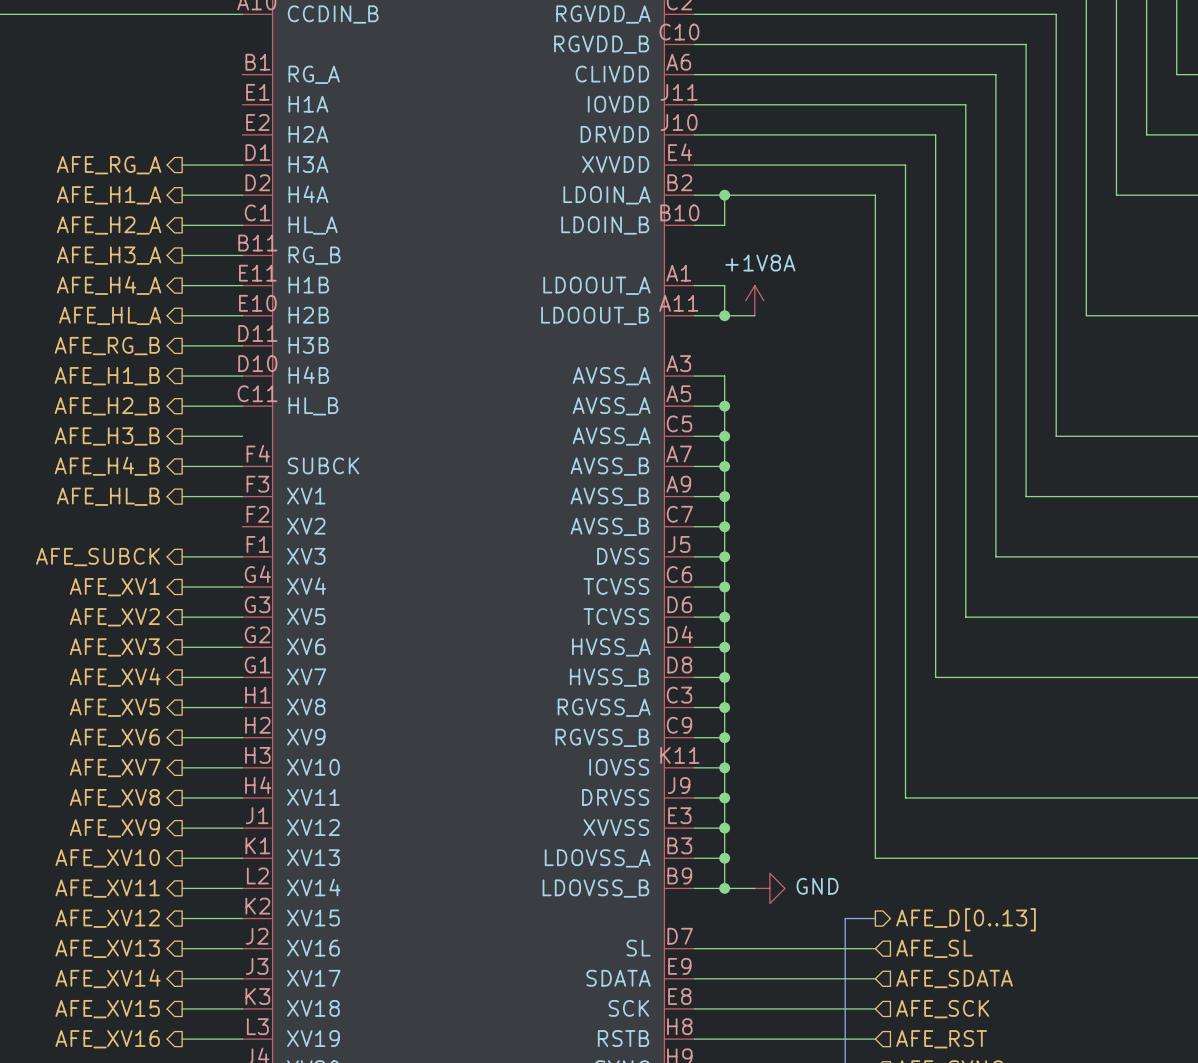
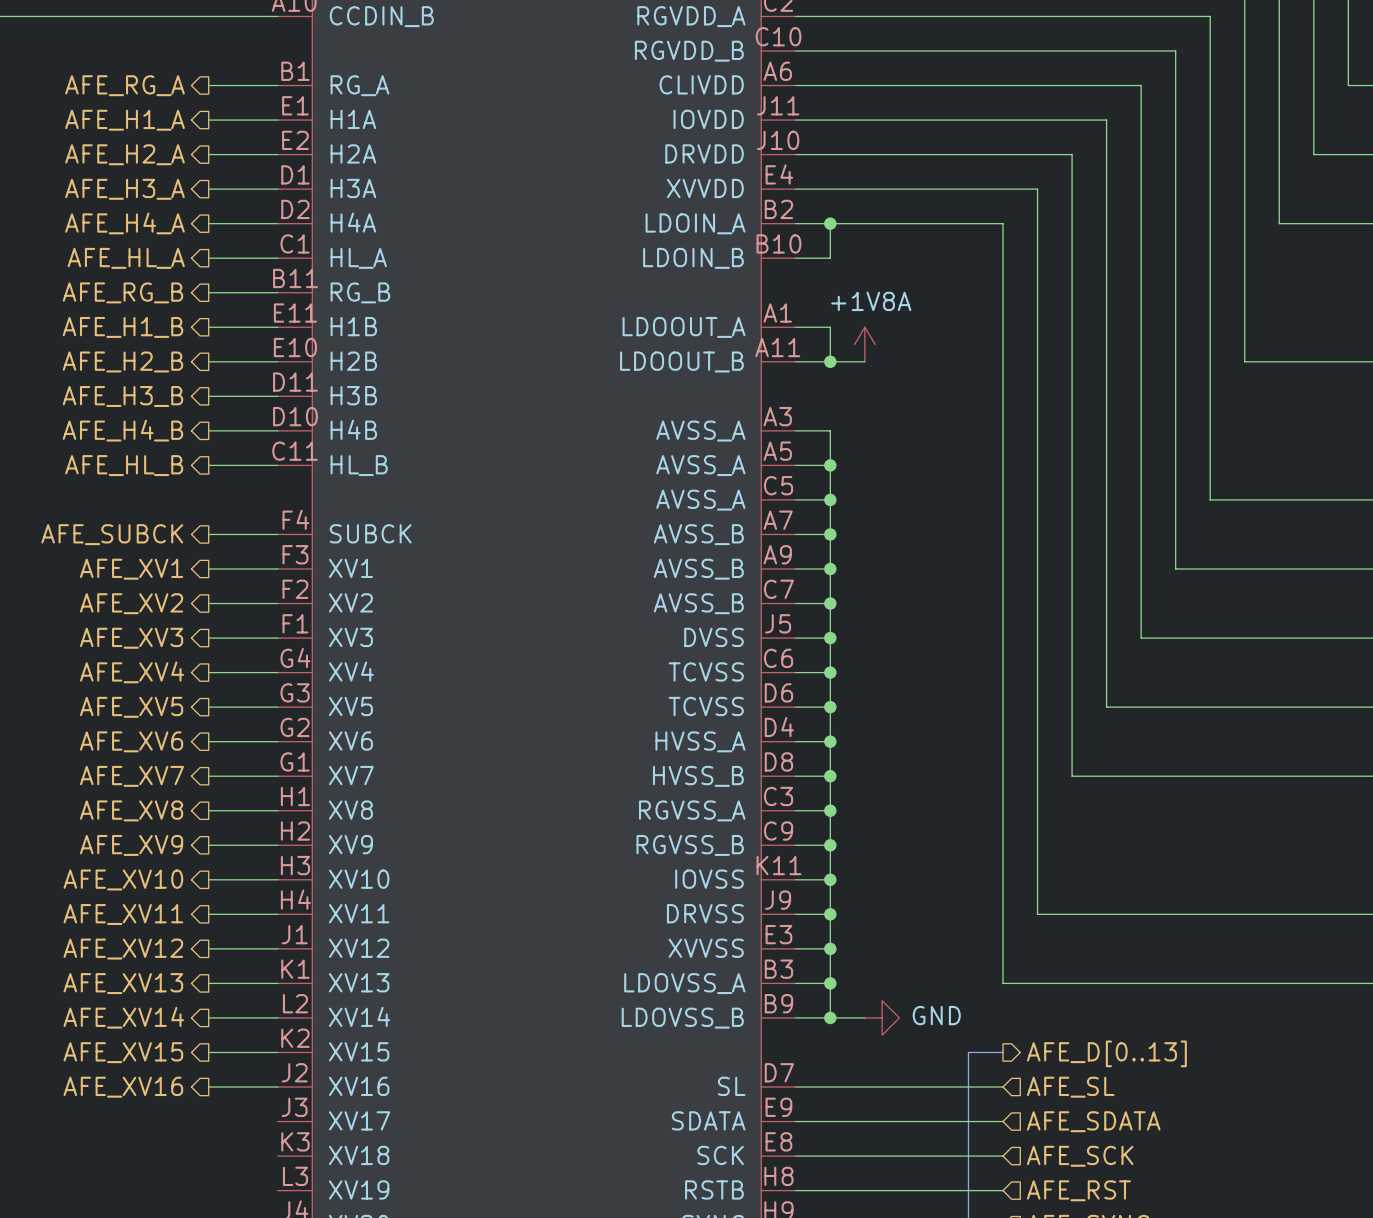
hierarchical label: none -> AFE_RG_A (124, 85)
wire: none -> (208, 85) (277, 85)
hierarchical label: none -> AFE_H1_A (124, 120)
wire: none -> (208, 120) (277, 120)
wire: none -> (208, 154) (277, 154)
hierarchical label: none -> AFE_H2_A (124, 154)
hierarchical label: AFE_RG_A (109, 165) -> AFE_H3_A (124, 189)
hierarchical label: AFE_H1_A (109, 195) -> AFE_H4_A (124, 223)
hierarchical label: AFE_H2_A (109, 225) -> AFE_HL_A (126, 258)
hierarchical label: AFE_H3_A (109, 255) -> AFE_RG_B (122, 292)
hierarchical label: AFE_H4_A (109, 285) -> AFE_H1_B (122, 327)
hierarchical label: AFE_HL_A (110, 315) -> AFE_H2_B (122, 361)
hierarchical label: AFE_RG_B (107, 346) -> AFE_H3_B (122, 396)
hierarchical label: AFE_H1_B (107, 376) -> AFE_H4_B (122, 430)
hierarchical label: AFE_H2_B (107, 406) -> AFE_HL_B (124, 465)
hierarchical label: AFE_H3_B (107, 436) -> none
wire: (182, 436) (242, 436) -> (208, 603) (277, 603)
hierarchical label: AFE_H4_B (107, 466) -> AFE_SUBCK (112, 534)
hierarchical label: AFE_HL_B (108, 496) -> AFE_XV1 (131, 569)
hierarchical label: none -> AFE_XV2 (131, 603)
hierarchical label: AFE_SUBCK (97, 557) -> AFE_XV3 (131, 638)
hierarchical label: AFE_XV1 (114, 587) -> AFE_XV4 (131, 672)
hierarchical label: AFE_XV2 (114, 617) -> AFE_XV5 (131, 707)
hierarchical label: AFE_XV3 (114, 647) -> AFE_XV6 (131, 741)
hierarchical label: AFE_XV4 (115, 677) -> AFE_XV7 (131, 776)
hierarchical label: AFE_XV5 (114, 707) -> AFE_XV8 (131, 810)
hierarchical label: AFE_XV6 (114, 737) -> AFE_XV9 (131, 845)
hierarchical label: AFE_XV7 (115, 768) -> AFE_XV10 (123, 879)
hierarchical label: AFE_XV8 (114, 798) -> AFE_XV11 (123, 914)
hierarchical label: AFE_XV9 (114, 828) -> AFE_XV12 (123, 949)
hierarchical label: AFE_XV10 (107, 858) -> AFE_XV13 (123, 983)
hierarchical label: AFE_XV11 (107, 888) -> AFE_XV14 (123, 1017)
hierarchical label: AFE_XV12 (107, 918) -> AFE_XV15 (123, 1052)
hierarchical label: AFE_XV13 (107, 948) -> AFE_XV16 (123, 1087)
hierarchical label: AFE_XV14 (108, 978) -> none
wire: (182, 978) (242, 978) -> none
wire: (182, 1008) (242, 1008) -> none
hierarchical label: AFE_XV15 (107, 1009) -> none
hierarchical label: AFE_XV16 (107, 1039) -> none
wire: (182, 1039) (242, 1039) -> none

